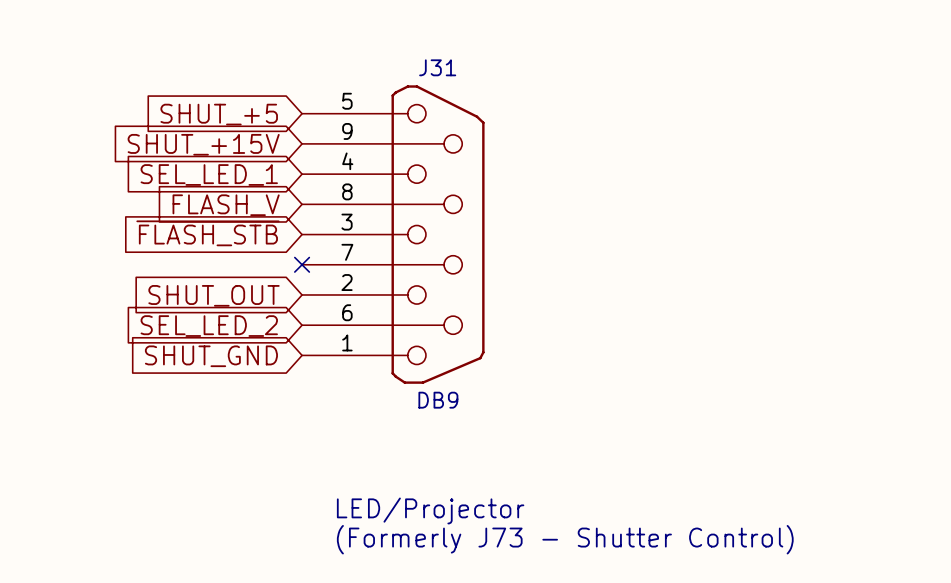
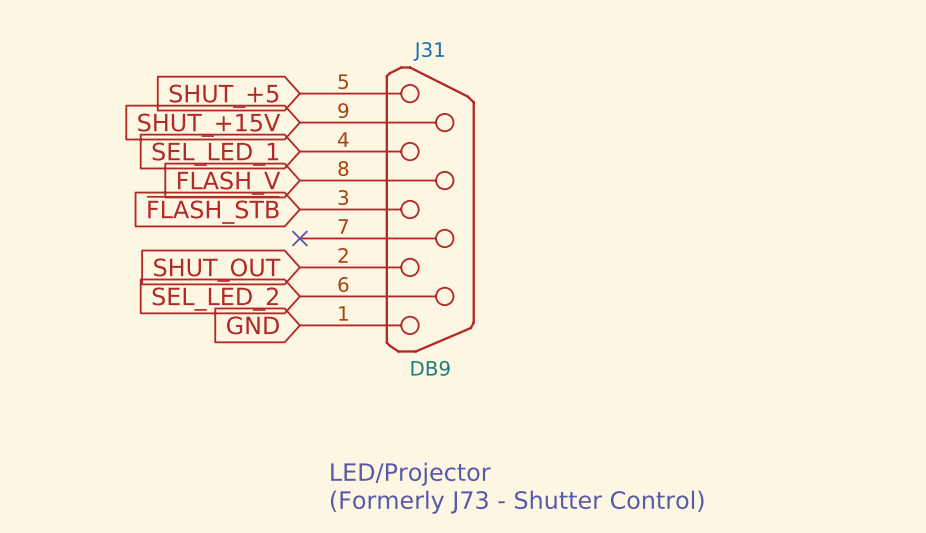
global label: SHUT_GND (211, 356) -> GND (252, 325)

